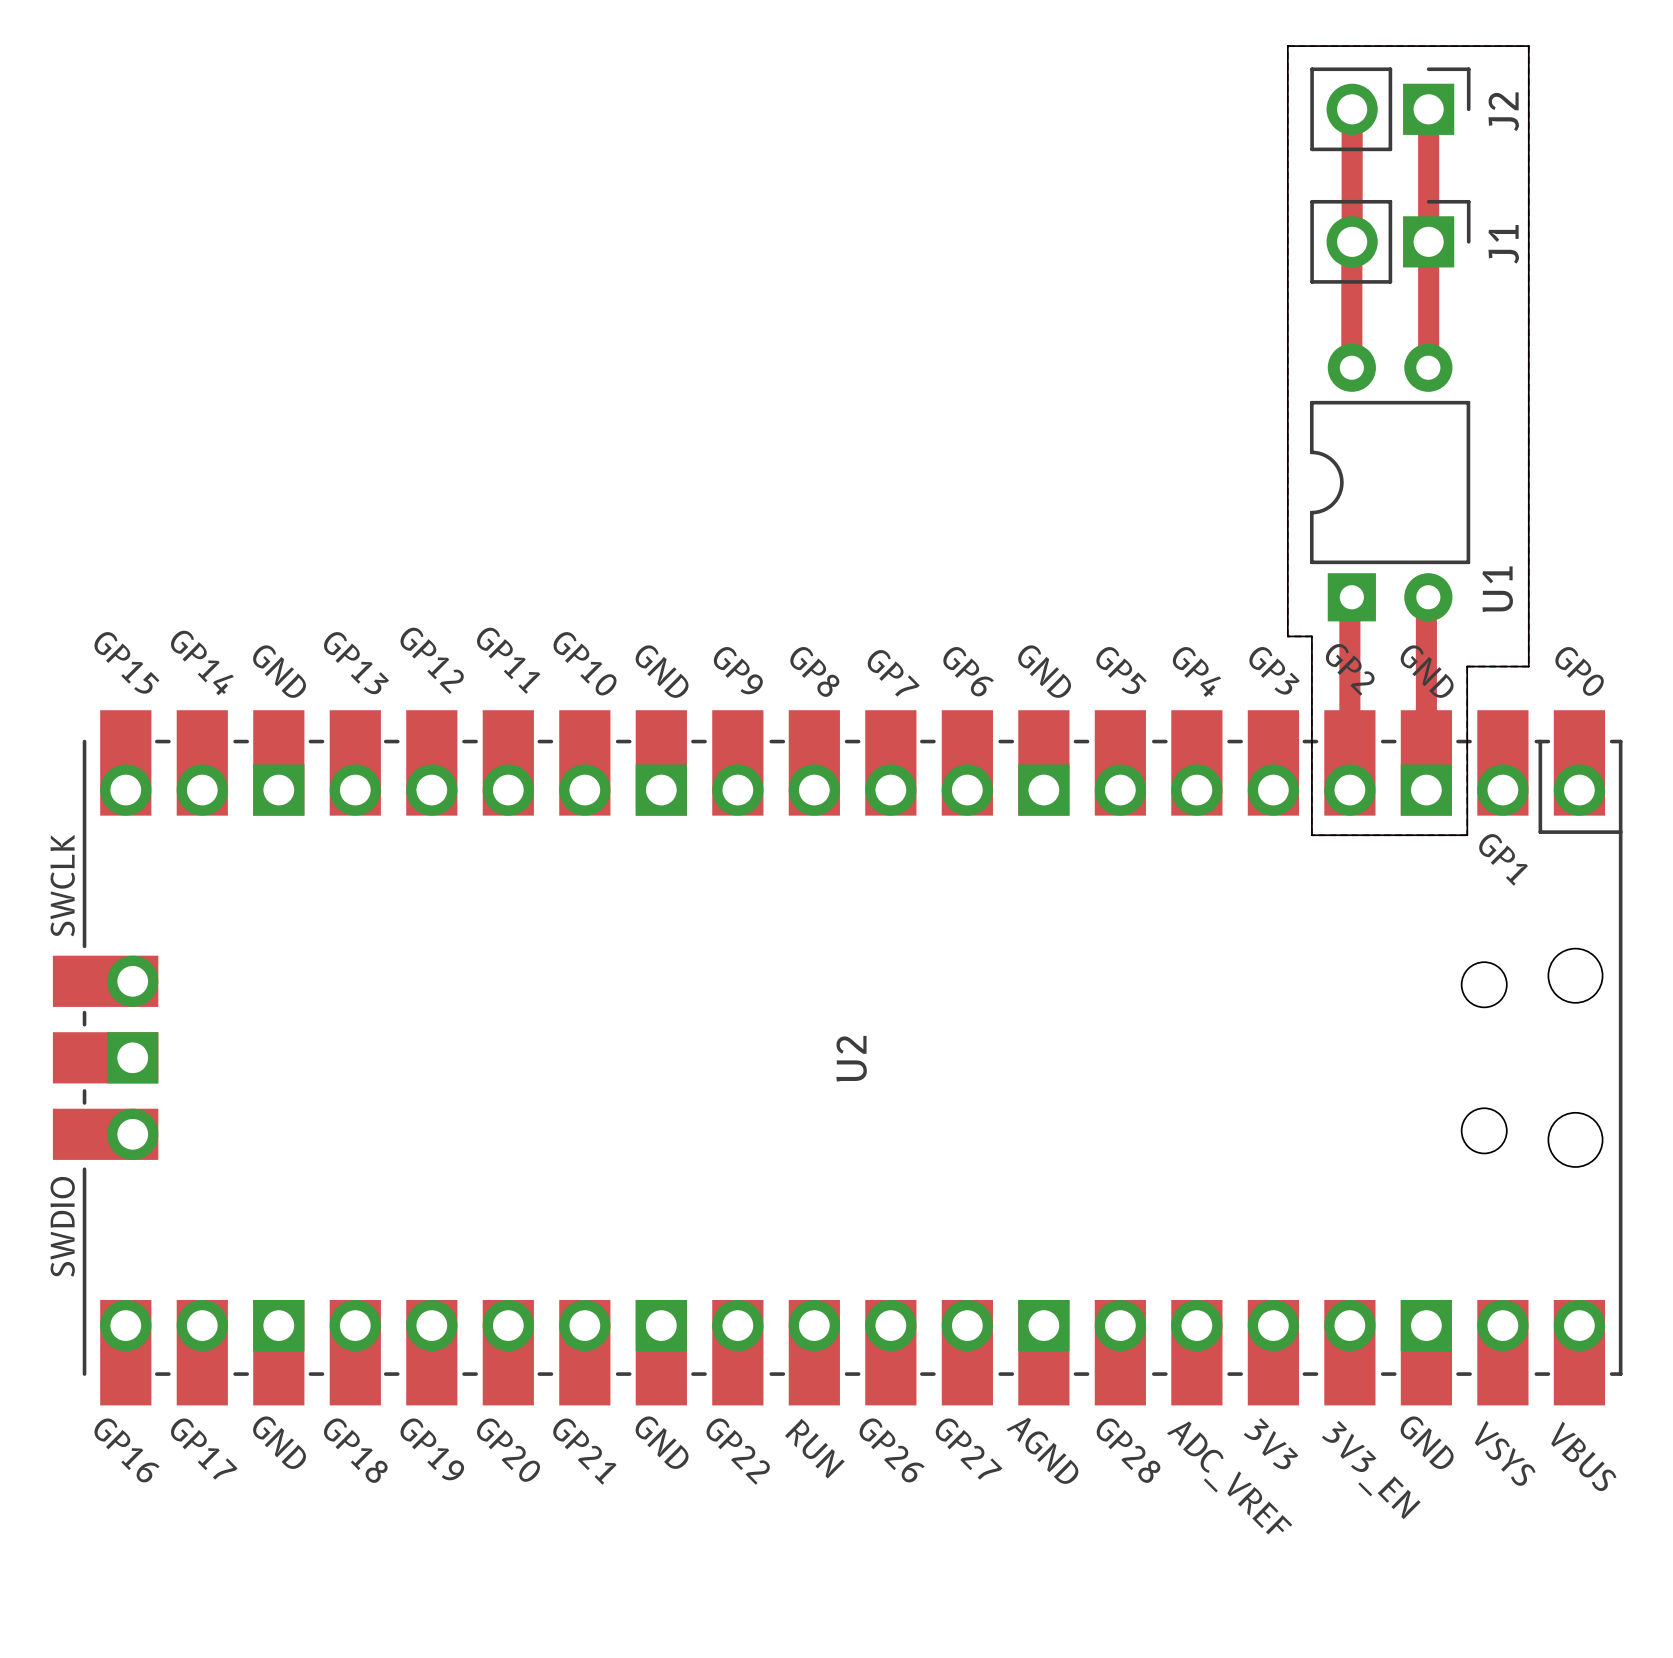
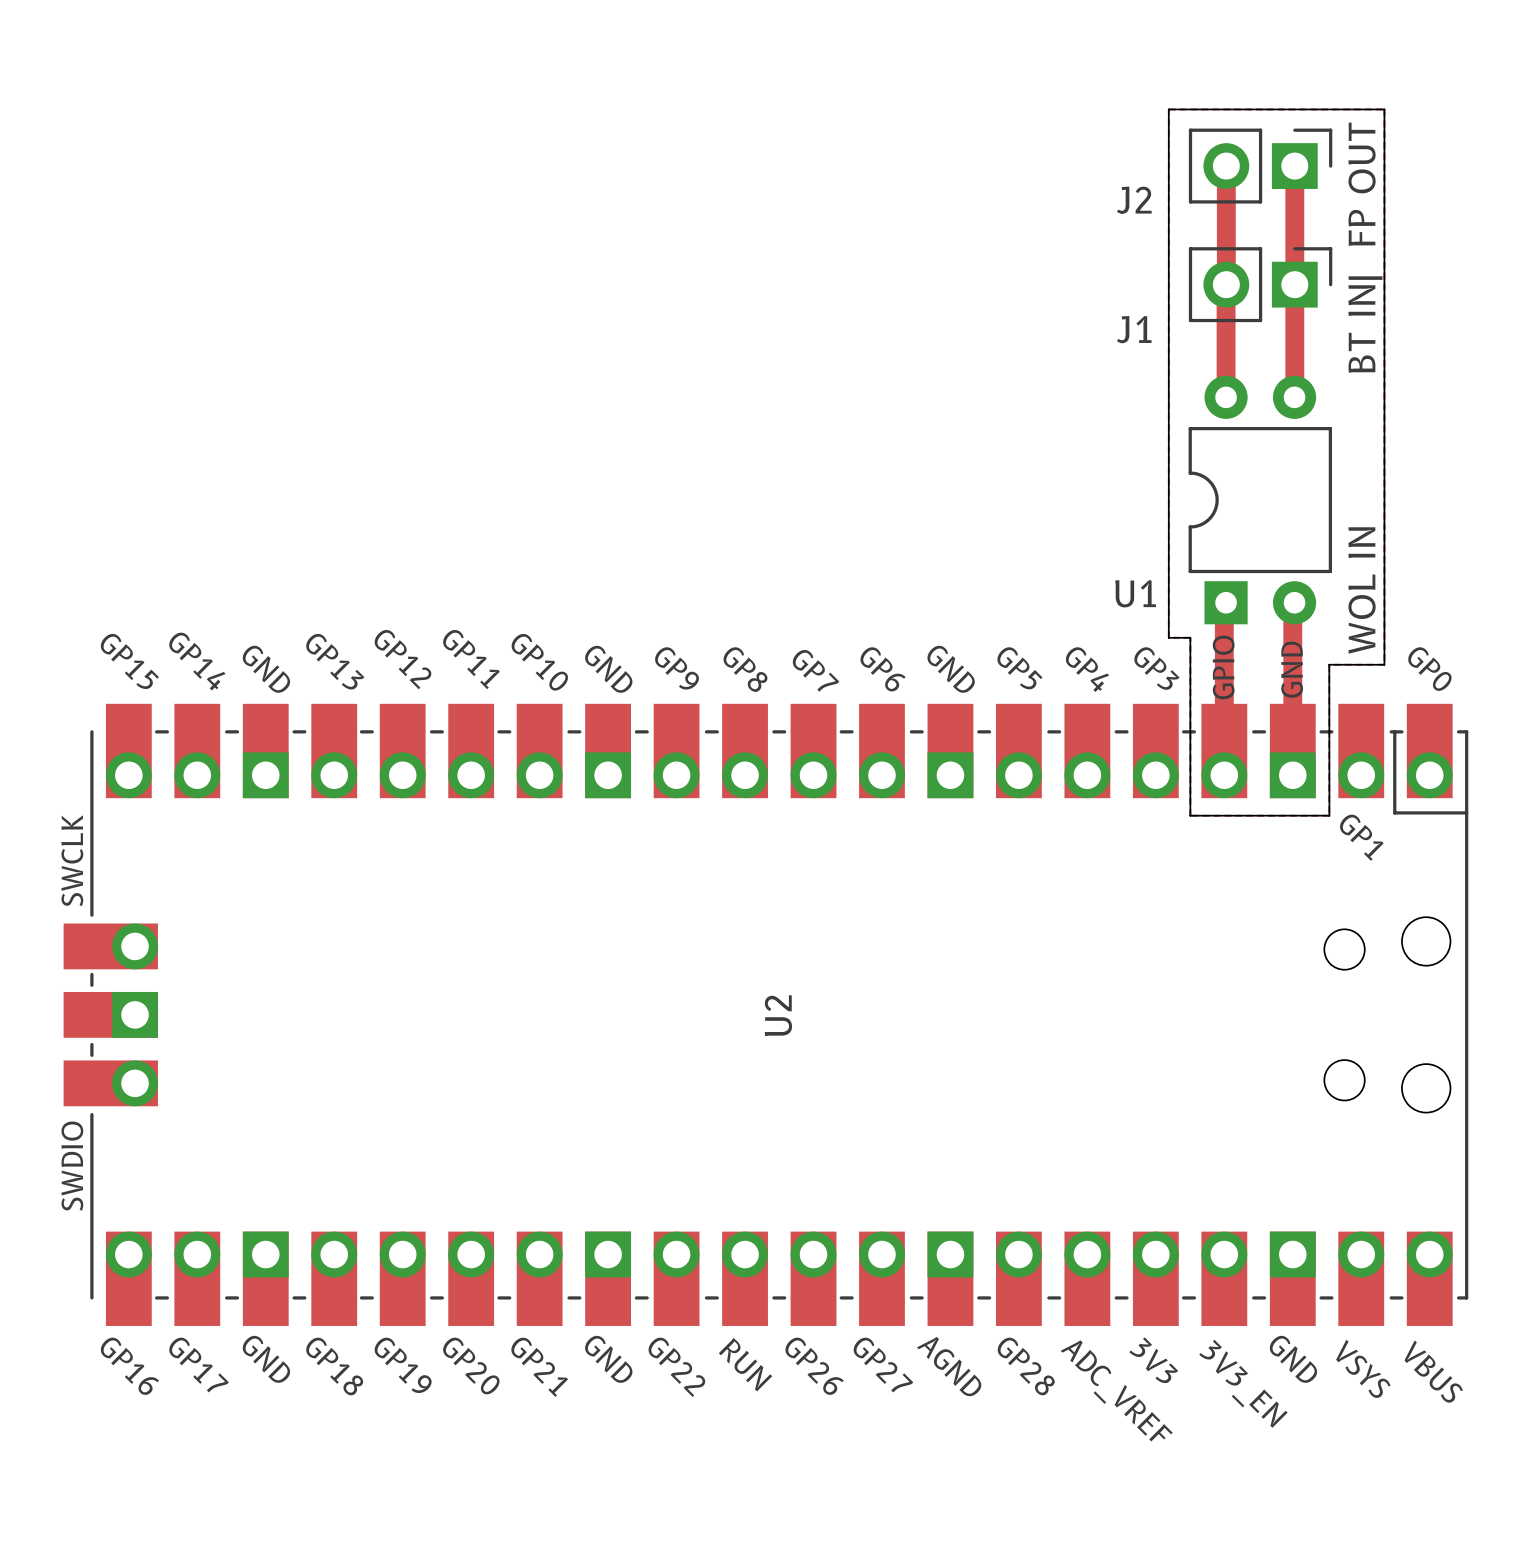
J2 name rotation: 0° (1503, 111) -> 90° clockwise (1134, 200)
J2 name position: J2 (1503, 111) -> J2 (1134, 200)
text: none -> FP OUT (1362, 184)
J1 name rotation: 0° (1503, 244) -> 90° clockwise (1134, 329)
J1 name position: J1 (1503, 244) -> J1 (1134, 329)
text: none -> BT IN| (1365, 324)
text: none -> WOL IN (1362, 590)
U1 name rotation: 0° (1497, 589) -> 90° clockwise (1135, 593)
U1 name position: U1 (1497, 589) -> U1 (1135, 593)
U2 footprint: [52, 710, 1623, 1406] -> [63, 703, 1469, 1326]

